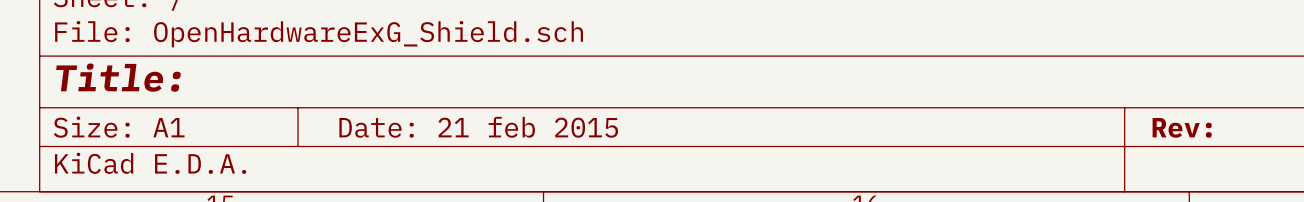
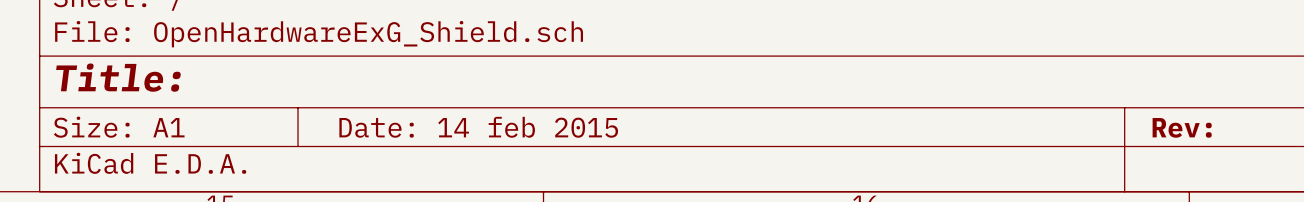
title block: Date: 21 feb 2015 (478, 127) -> Date: 14 feb 2015 (478, 127)

